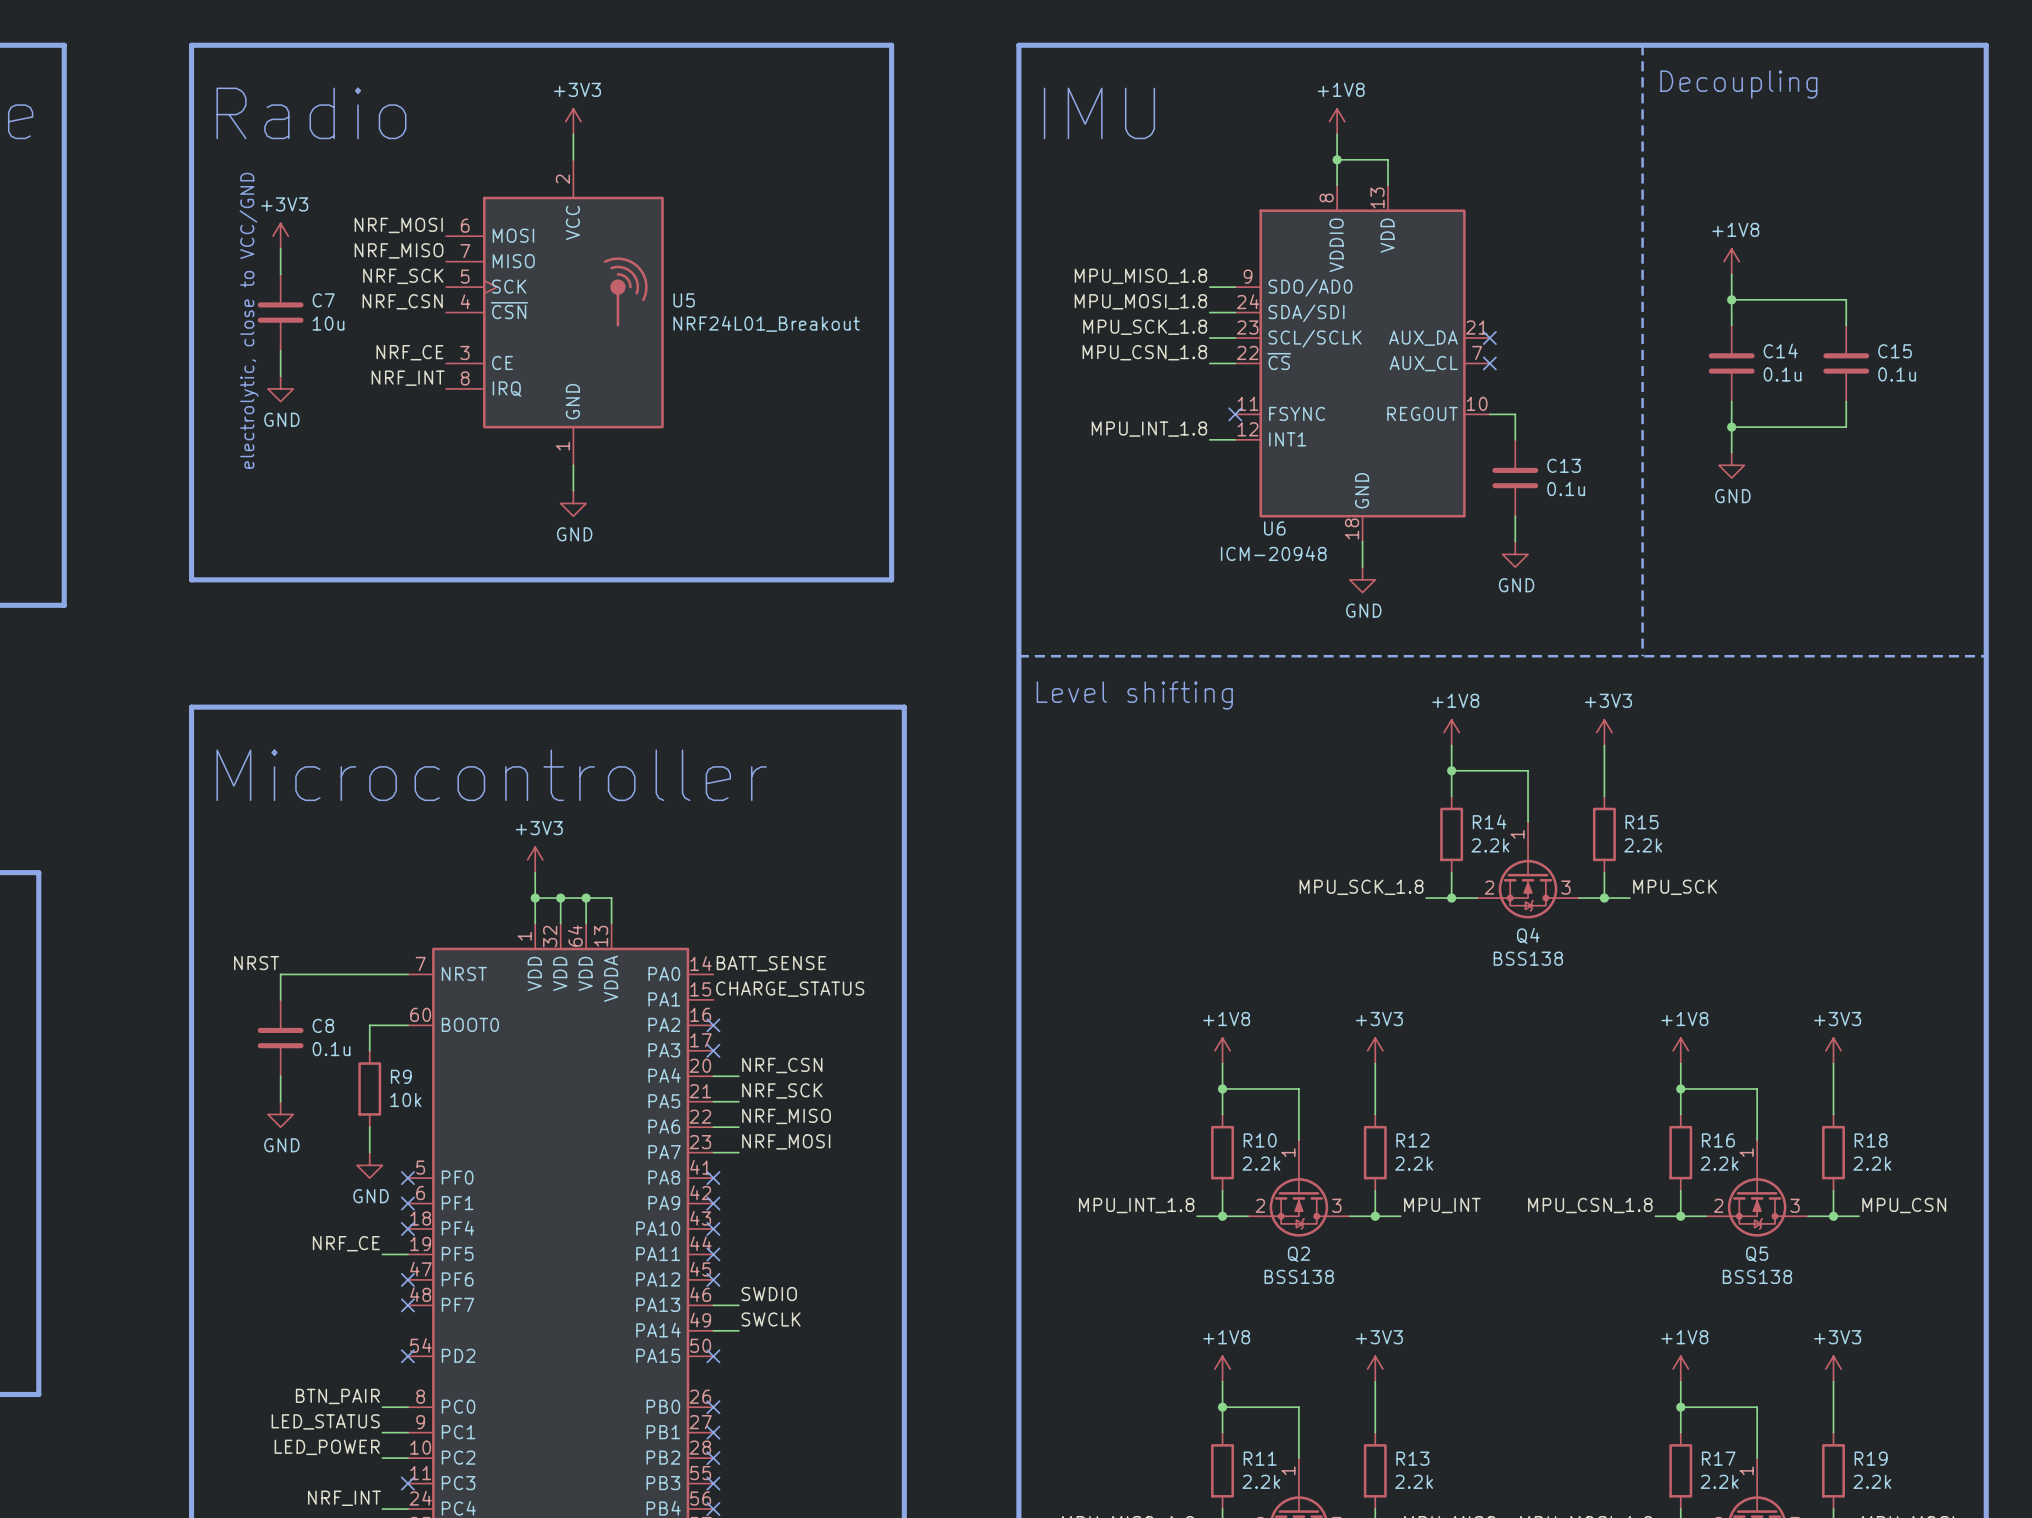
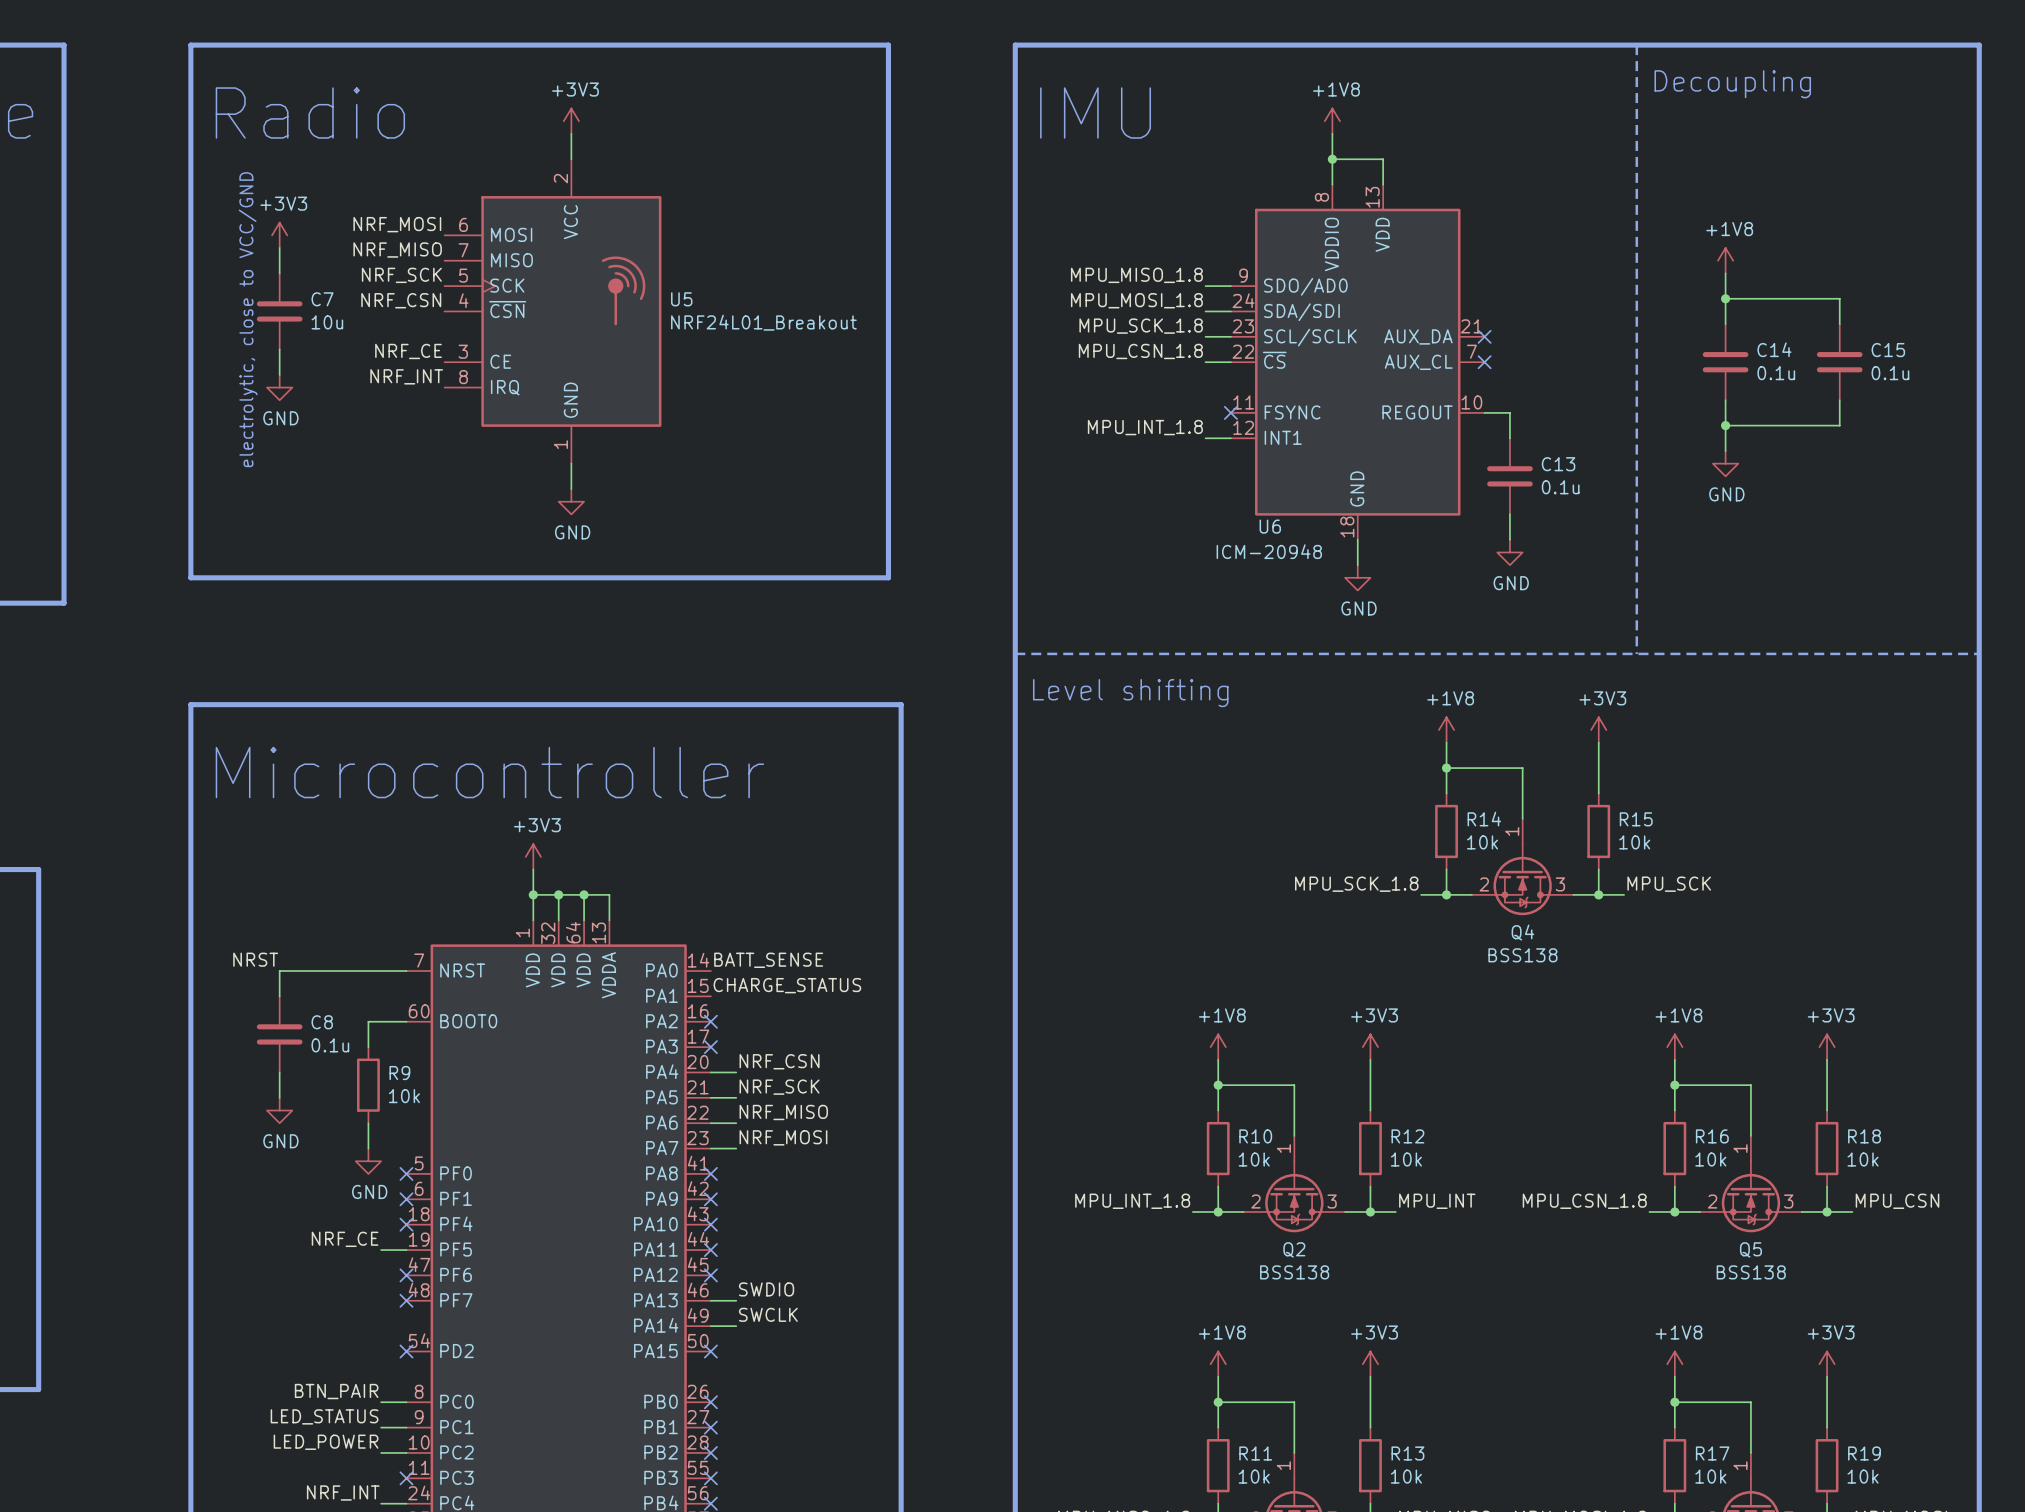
R14 value: 2.2k (1490, 845) -> 10k (1482, 842)
R15 value: 2.2k (1643, 845) -> 10k (1634, 842)
R10 value: 2.2k (1261, 1163) -> 10k (1254, 1159)
R12 value: 2.2k (1414, 1163) -> 10k (1406, 1159)
R16 value: 2.2k (1719, 1163) -> 10k (1710, 1159)
R18 value: 2.2k (1872, 1163) -> 10k (1863, 1159)
R11 value: 2.2k (1261, 1481) -> 10k (1254, 1476)
R13 value: 2.2k (1414, 1481) -> 10k (1406, 1476)
R17 value: 2.2k (1719, 1481) -> 10k (1710, 1476)
R19 value: 2.2k (1872, 1481) -> 10k (1863, 1476)

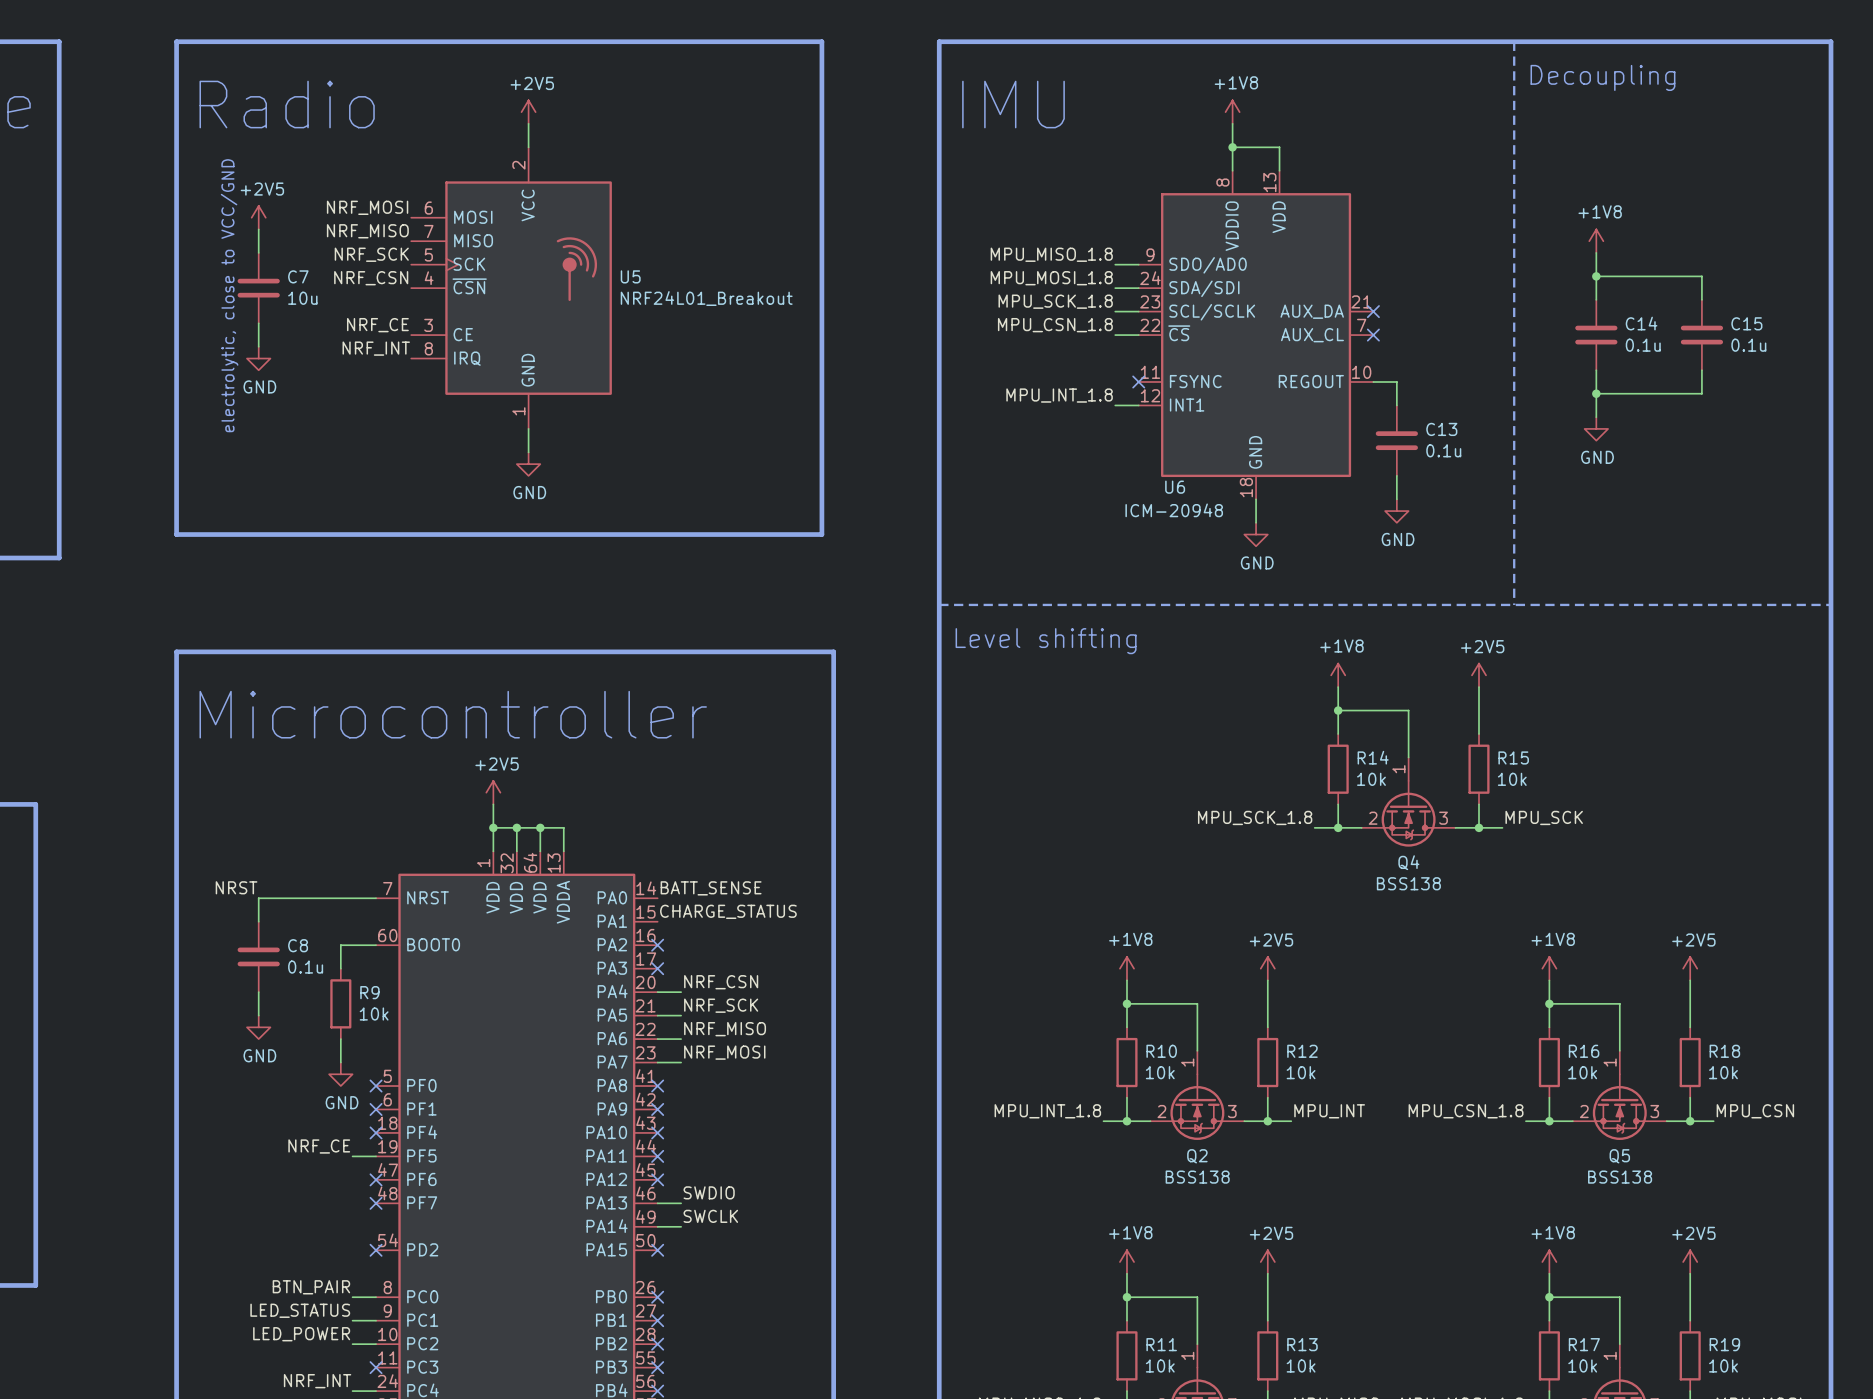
power symbol: +3V3 (571, 121) -> +2V5 (528, 112)
power symbol: +3V3 (279, 235) -> +2V5 (258, 217)
power symbol: +3V3 (1598, 730) -> +2V5 (1479, 675)
power symbol: +3V3 (533, 856) -> +2V5 (493, 792)
power symbol: +3V3 (1370, 1047) -> +2V5 (1267, 968)
power symbol: +3V3 (1827, 1047) -> +2V5 (1690, 968)
power symbol: +3V3 (1370, 1364) -> +2V5 (1267, 1262)
power symbol: +3V3 (1827, 1364) -> +2V5 (1690, 1262)

